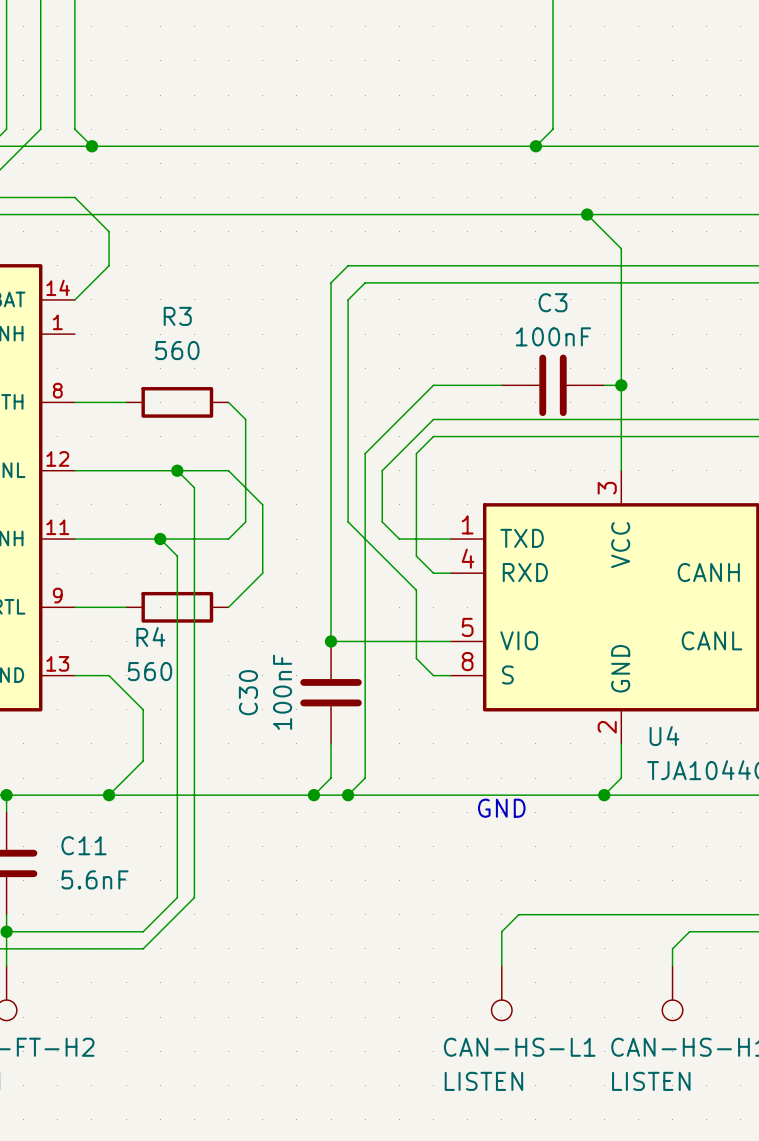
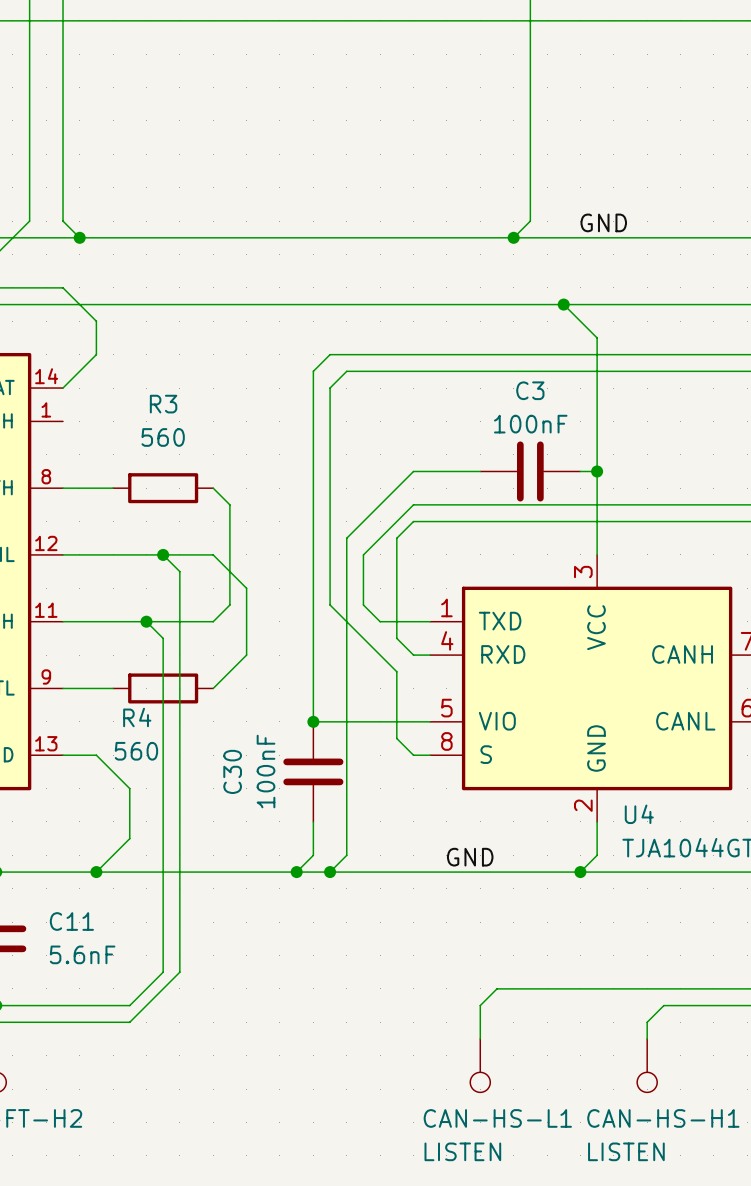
label: none -> GND (603, 222)
label: none -> GND (470, 857)
text: GND (501, 808) -> none

